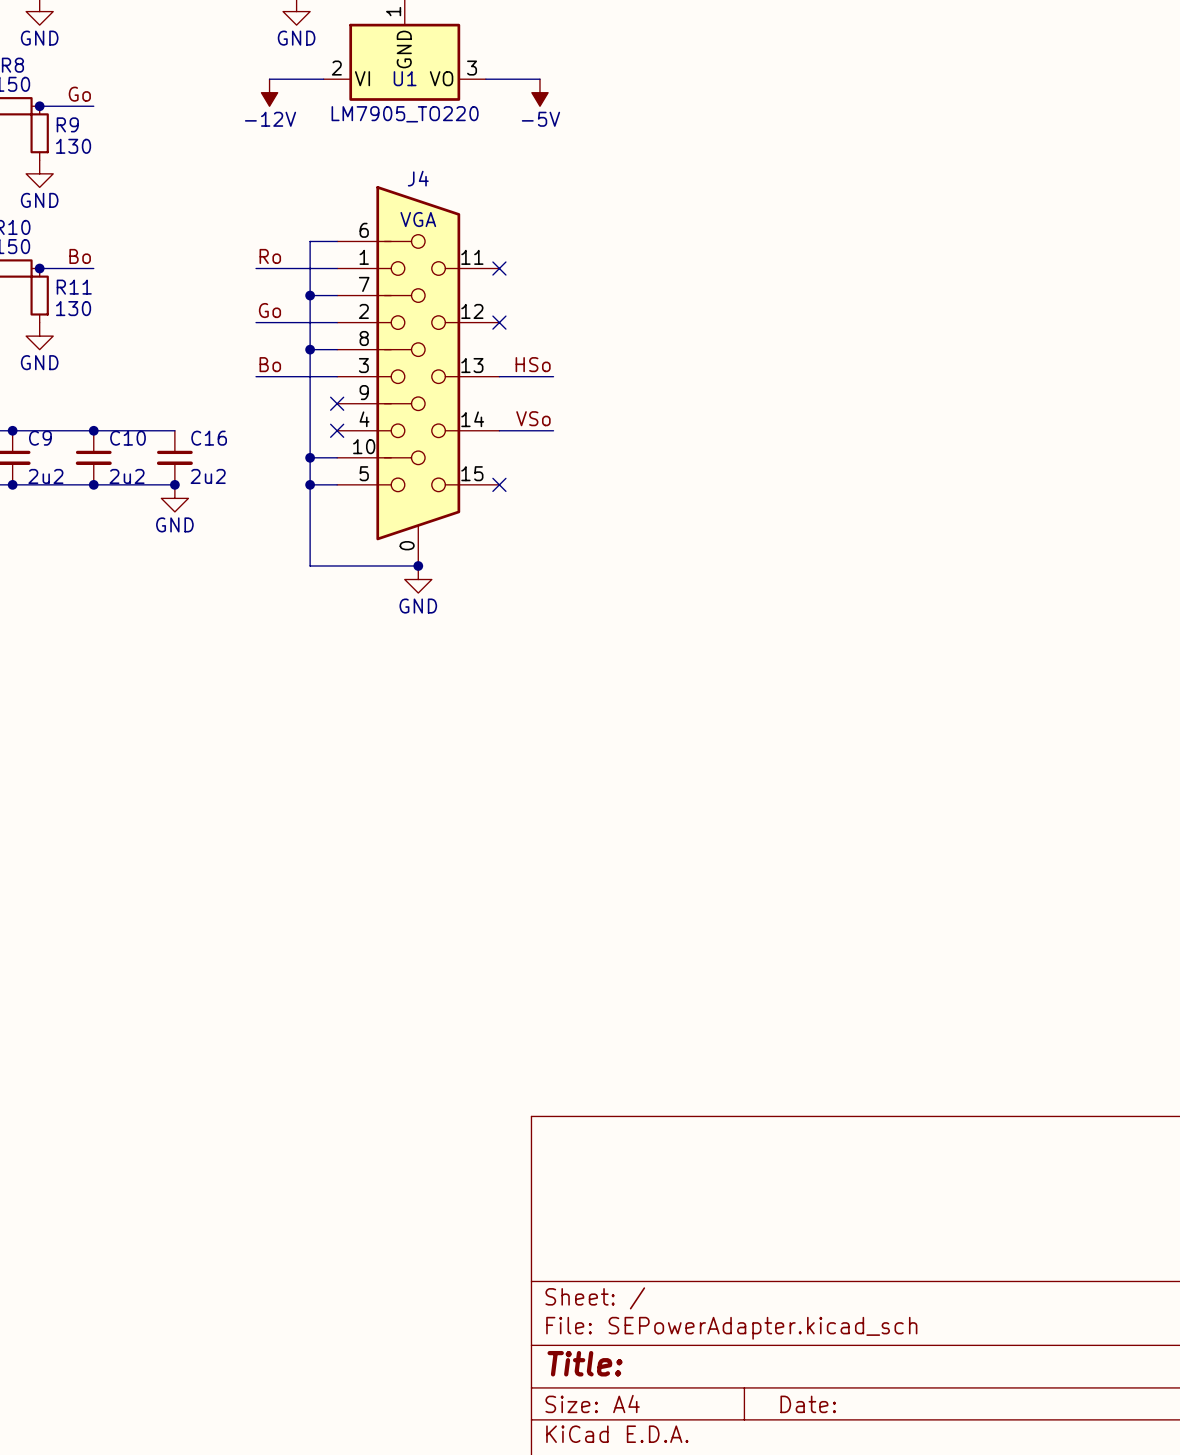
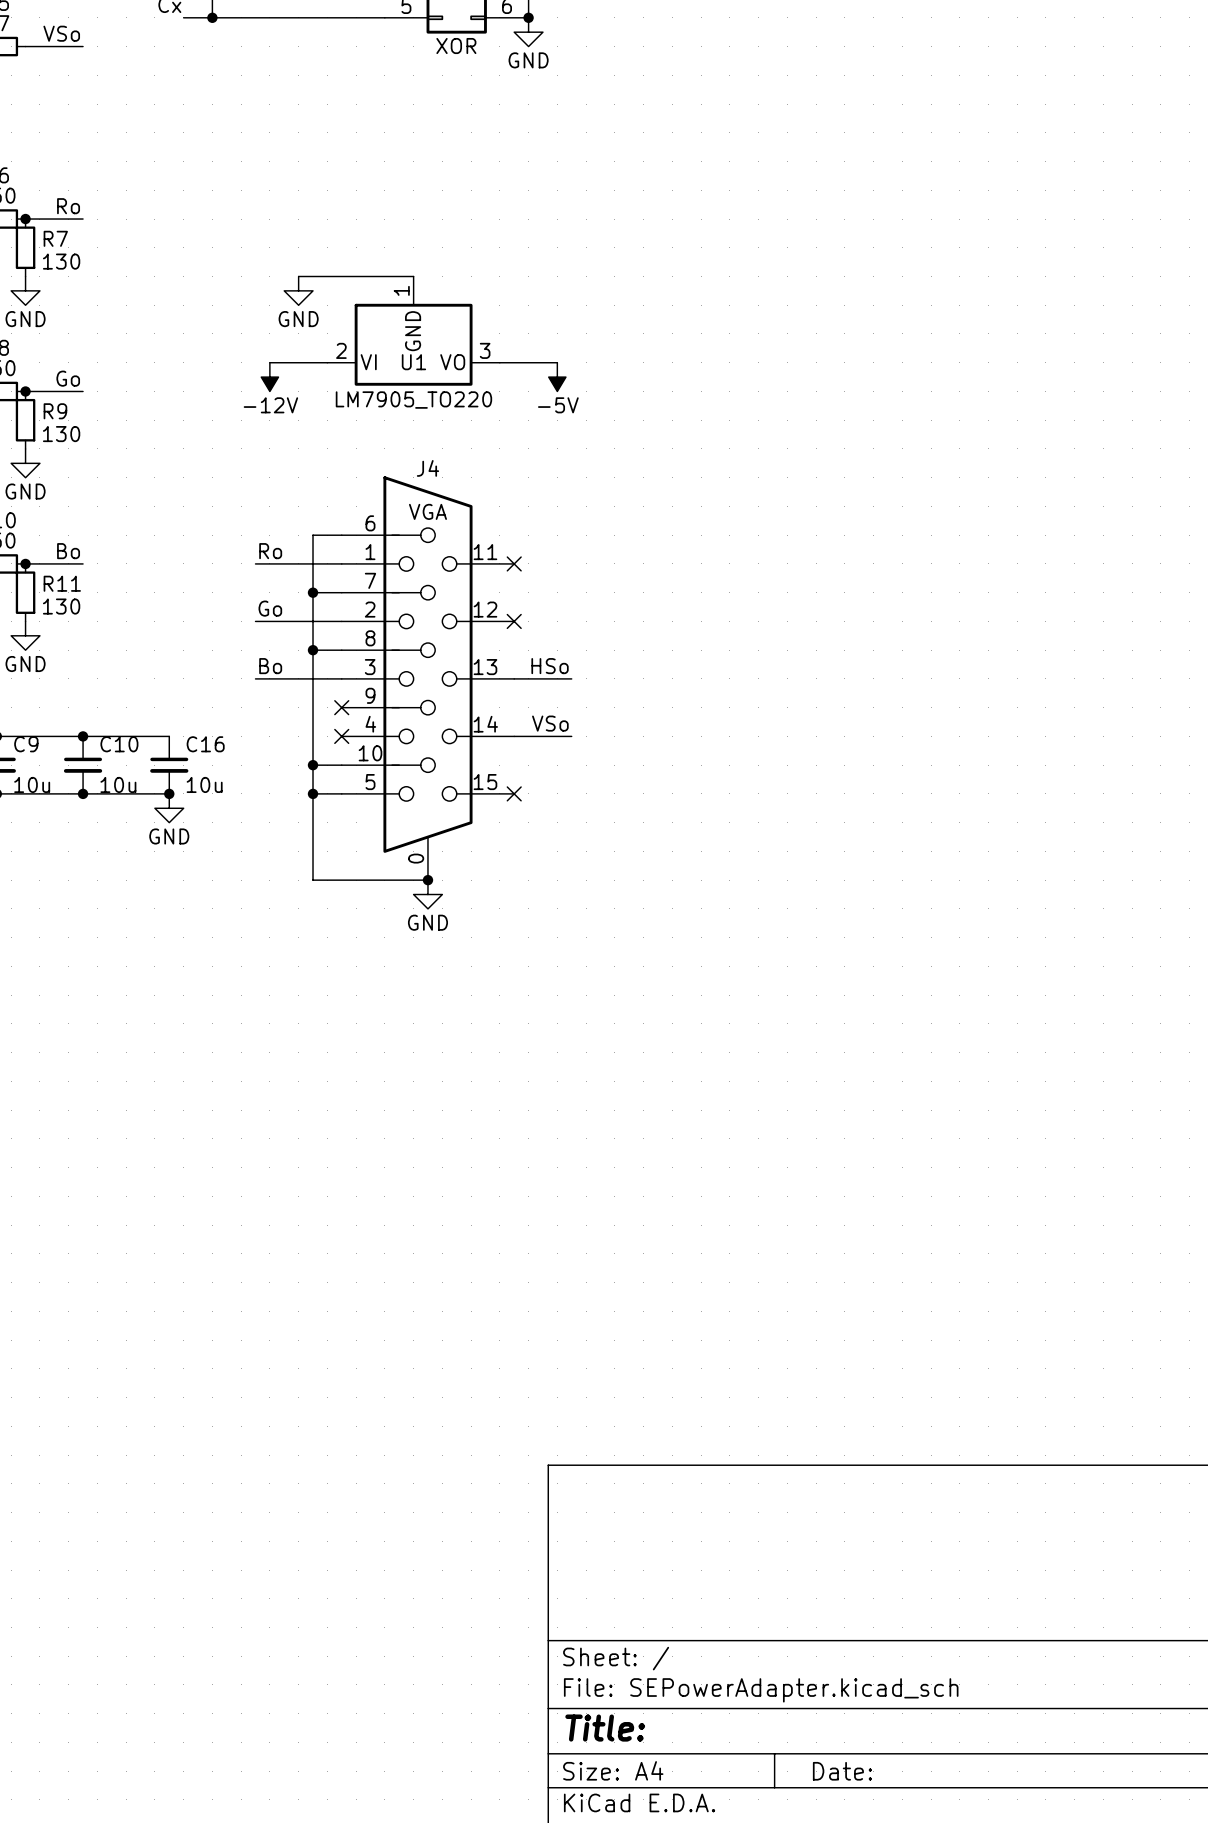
C9 value: 2u2 (45, 476) -> 10u (32, 784)
C10 value: 2u2 (127, 476) -> 10u (118, 784)
C16 value: 2u2 (208, 476) -> 10u (204, 784)

